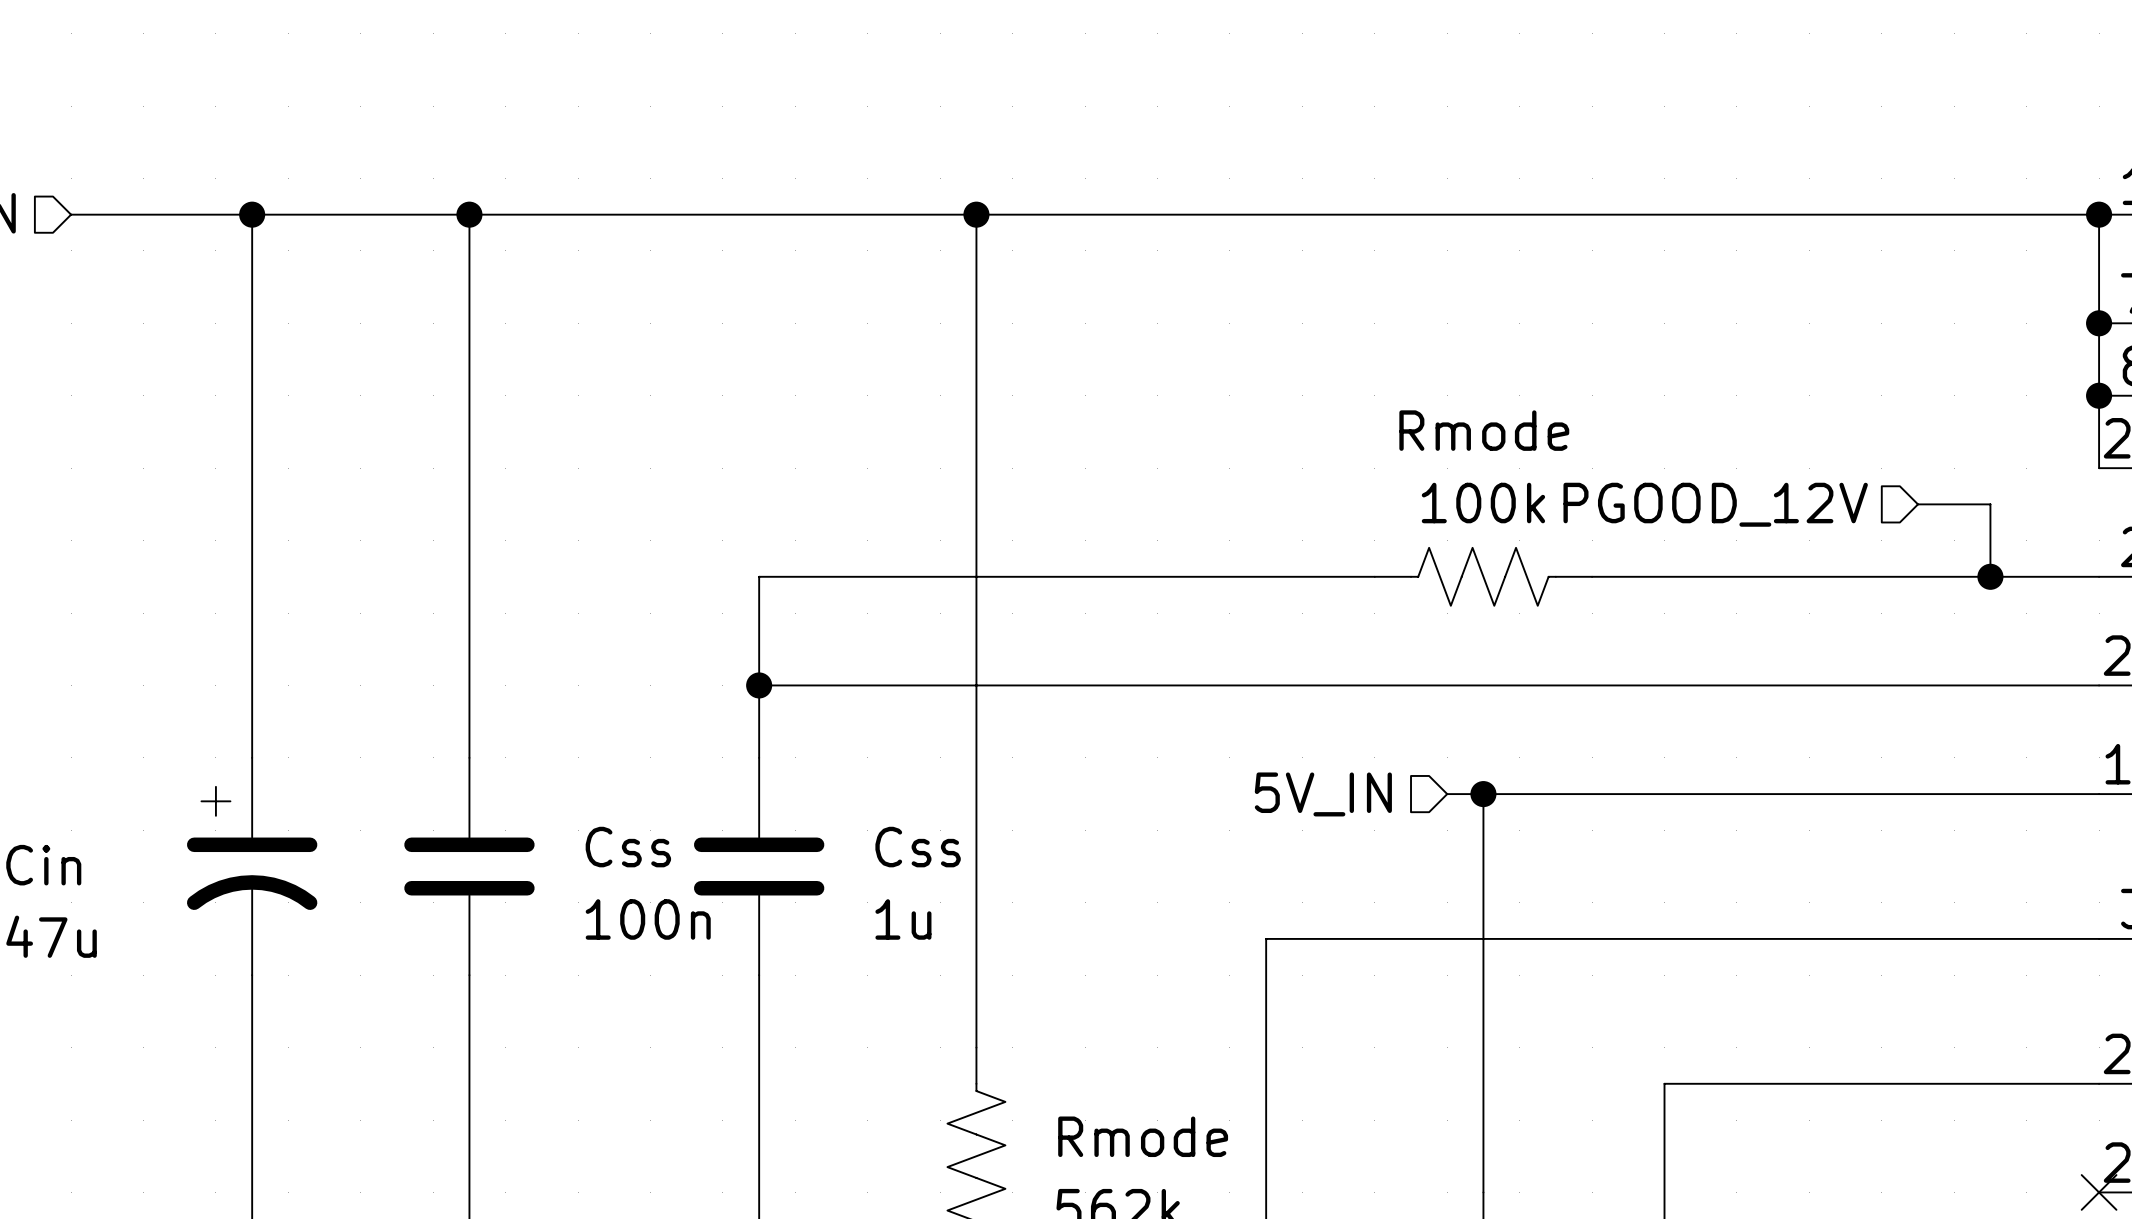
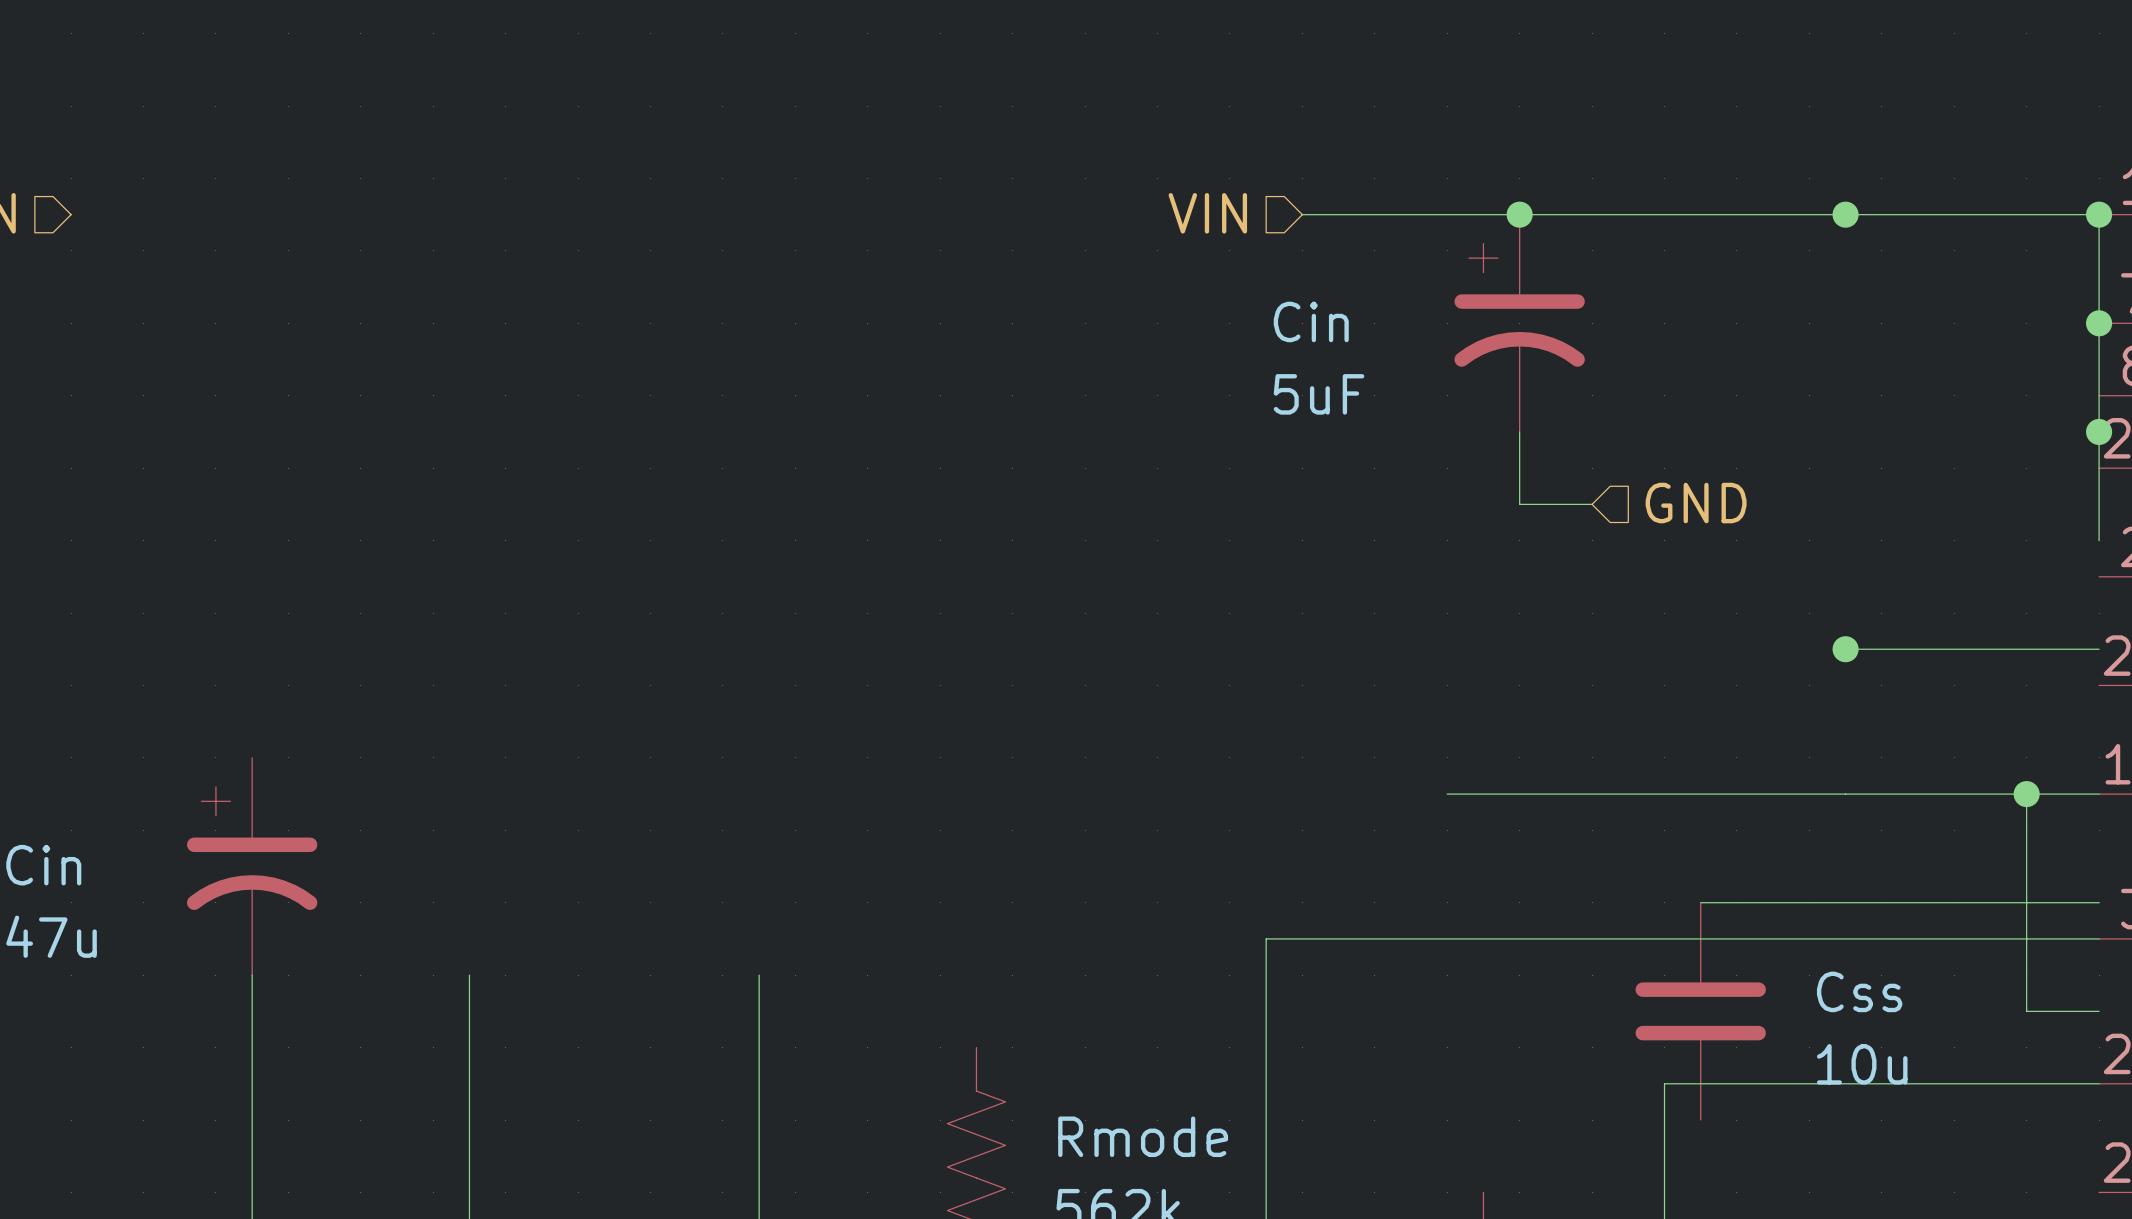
hierarchical label: none -> VIN (1207, 213)
wire: (71, 214) (1302, 214) -> none
wire: (252, 214) (252, 757) -> none
junction: (252, 214) -> none
wire: (469, 214) (469, 757) -> none
junction: (469, 214) -> none
wire: (976, 214) (976, 1047) -> none
junction: (976, 214) -> none
junction: none -> (1519, 214)
junction: none -> (1845, 214)
Cin: none -> 5uF (1519, 323)
junction position: (2099, 395) -> (2099, 431)
wire: none -> (1519, 431) (1519, 504) (1592, 504)
wire: none -> (2099, 468) (2099, 540)
hierarchical label: none -> GND (1696, 503)
hierarchical label: PGOOD_12V (1715, 504) -> none
wire: (1918, 504) (1990, 504) (1990, 576) -> none
wire: (1374, 576) (759, 576) (759, 757) -> none
Rmode: 100k (1483, 576) -> none
wire: (1592, 576) (2099, 576) -> none
junction: (1990, 576) -> none
wire: none -> (1845, 649) (2099, 649)
junction: none -> (1845, 649)
wire: (759, 685) (2099, 685) -> none
junction: (759, 685) -> none
hierarchical label: 5V_IN (1323, 794) -> none
wire: (1483, 794) (1483, 1192) -> none
junction: (1483, 794) -> none
wire: none -> (2026, 794) (2026, 1011) (2099, 1011)
junction: none -> (2026, 794)
Css: 100n (469, 866) -> none
Css: 1u (759, 866) -> none
wire: none -> (1700, 902) (2099, 902)
Css: none -> 10u (1700, 1011)
no-connect mark: (2099, 1192) -> none

